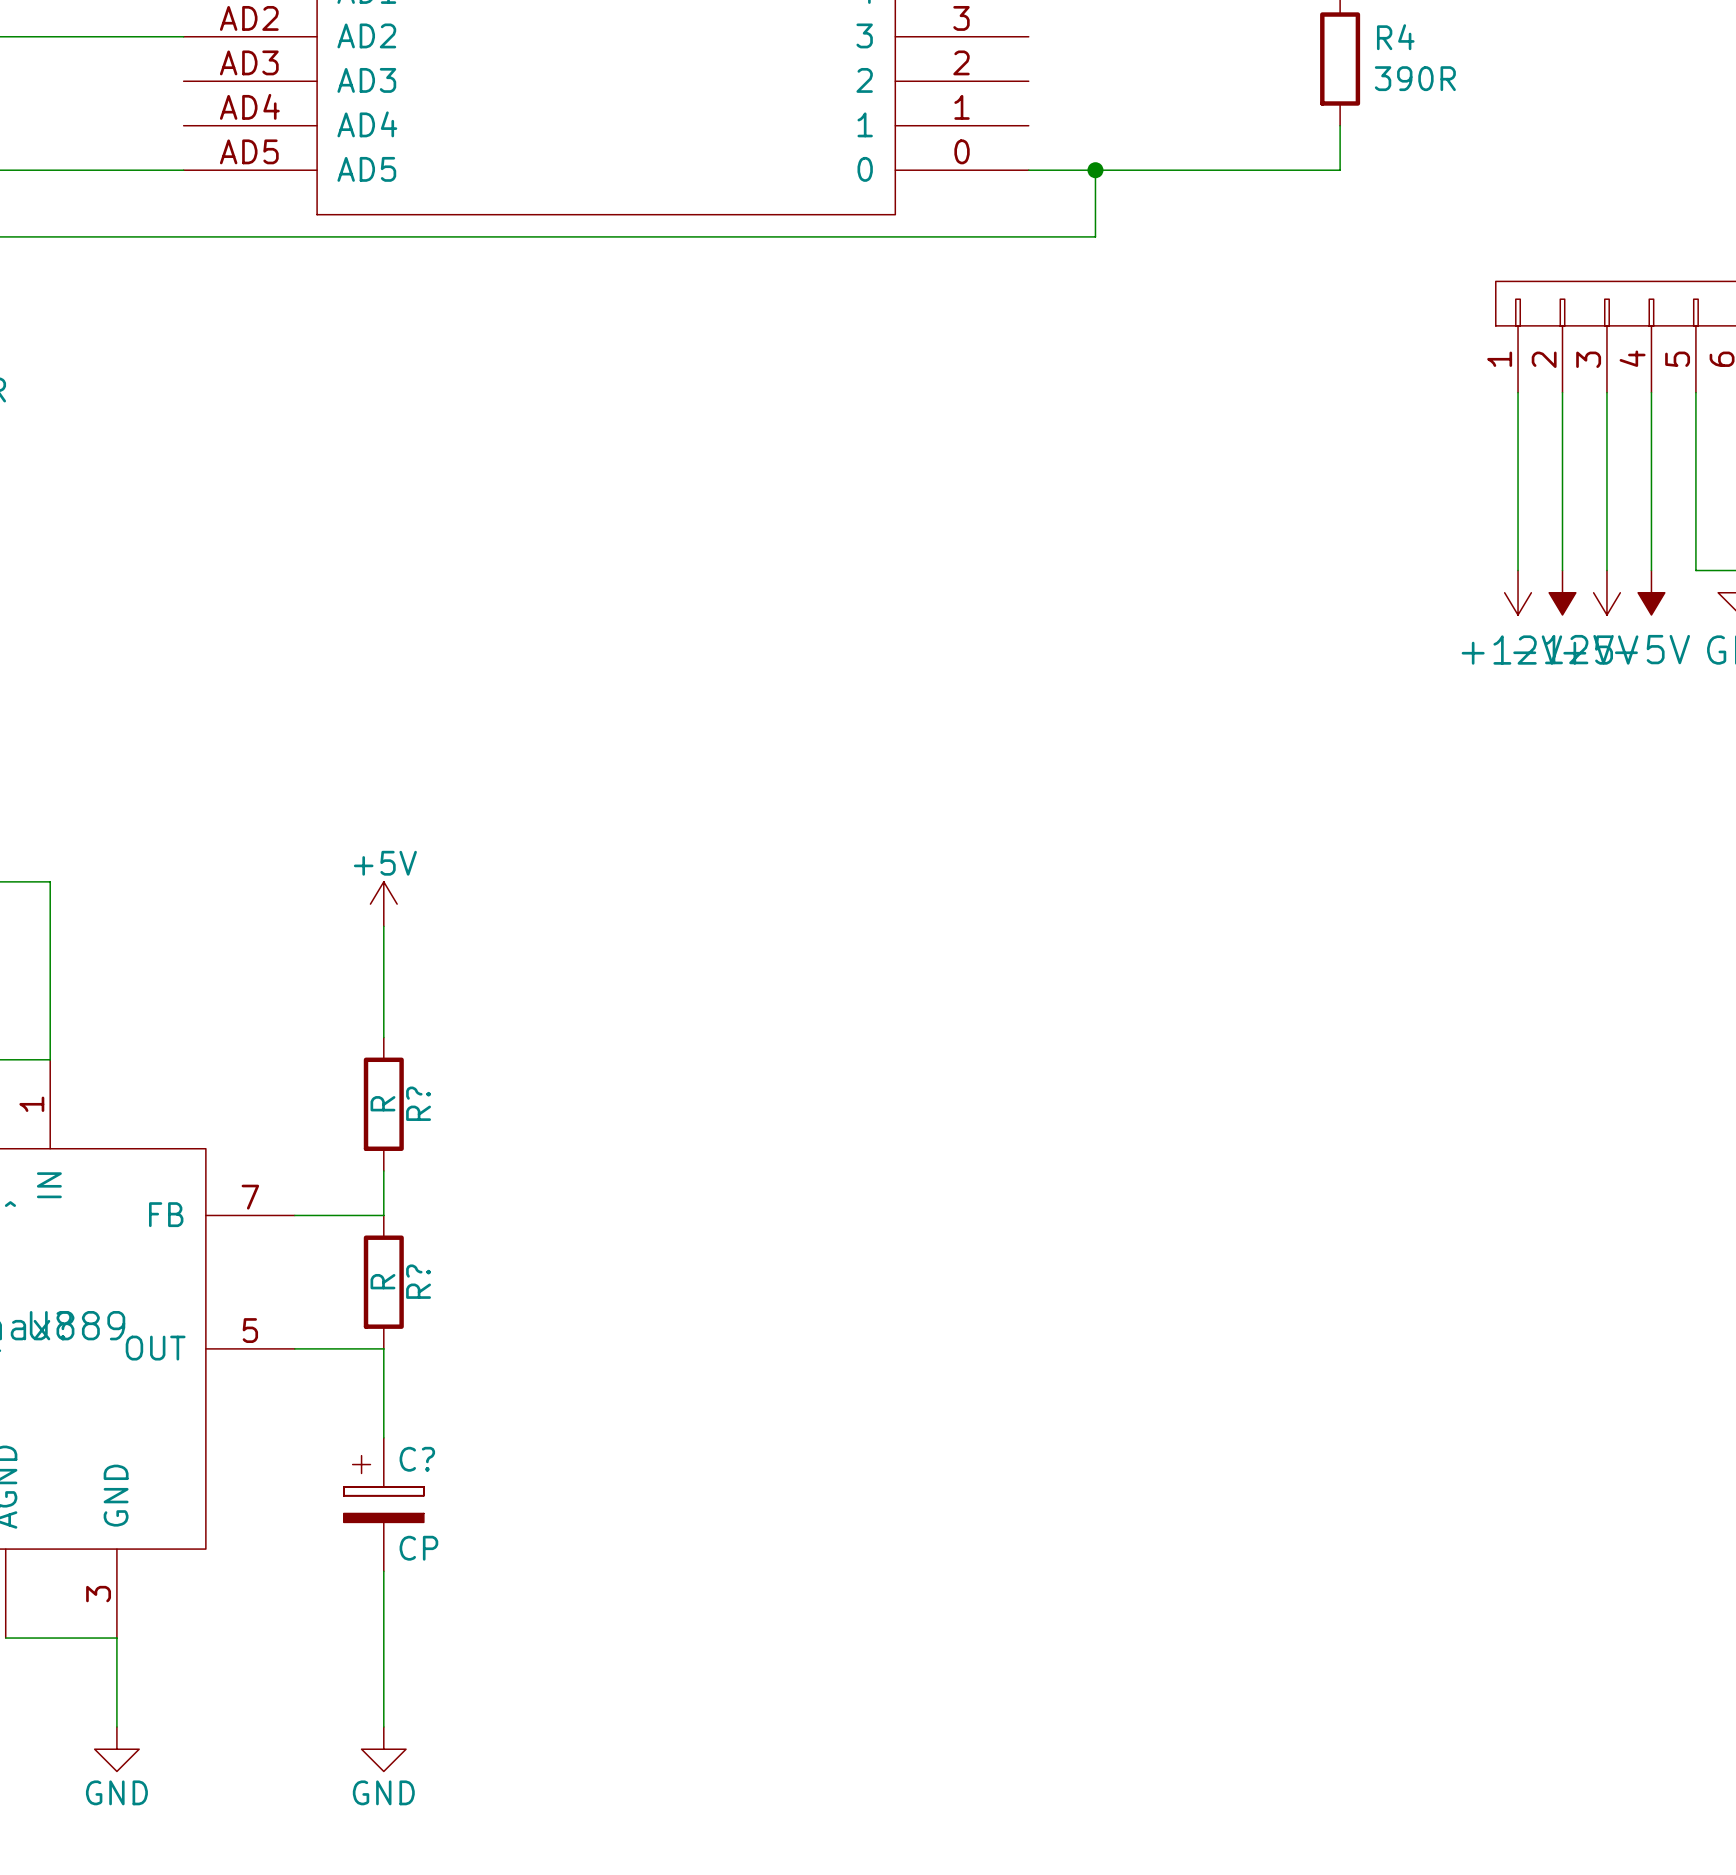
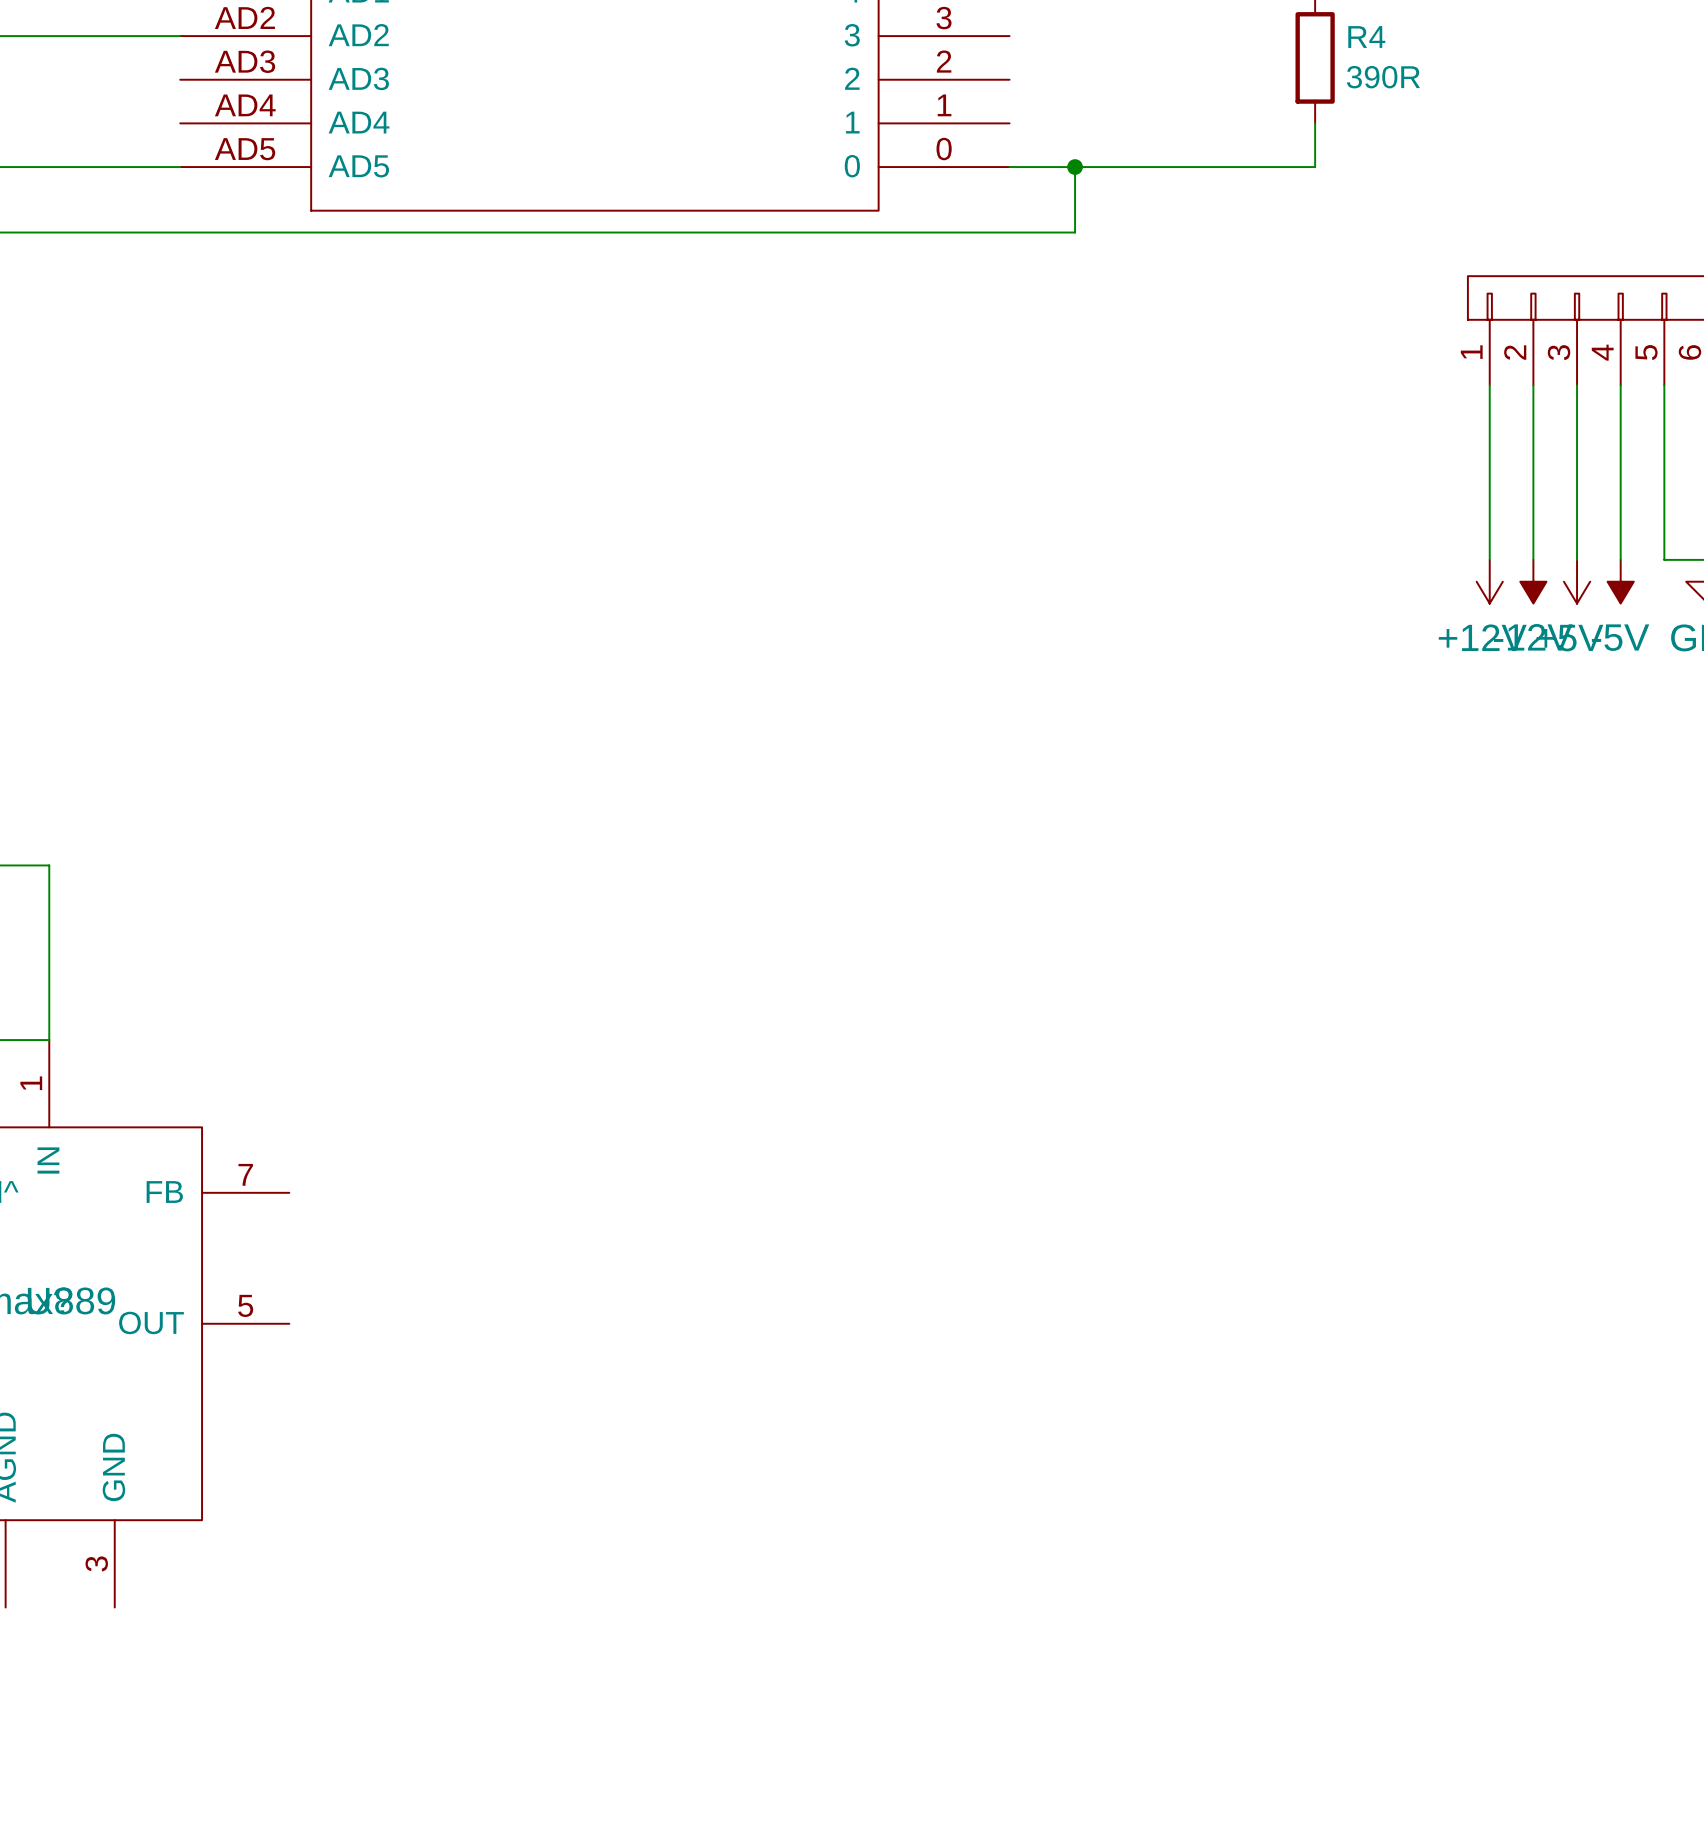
power symbol: +5V (383, 904) -> none
wire: (383, 926) (383, 1037) -> none
R?: R (383, 1104) -> none
wire: (383, 1170) (383, 1215) (294, 1215) -> none
R?: R (383, 1282) -> none
wire: (294, 1348) (383, 1348) (383, 1437) -> none
C?: CP (383, 1504) -> none
wire: (383, 1571) (383, 1726) -> none
wire: (5, 1638) (116, 1638) (116, 1726) -> none
power symbol: GND (116, 1749) -> none
power symbol: GND (383, 1749) -> none

